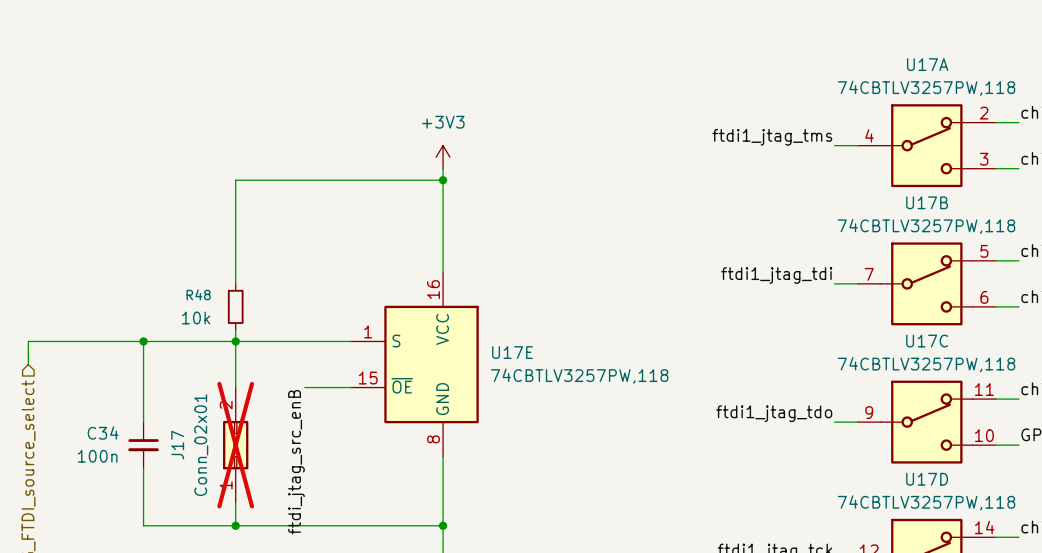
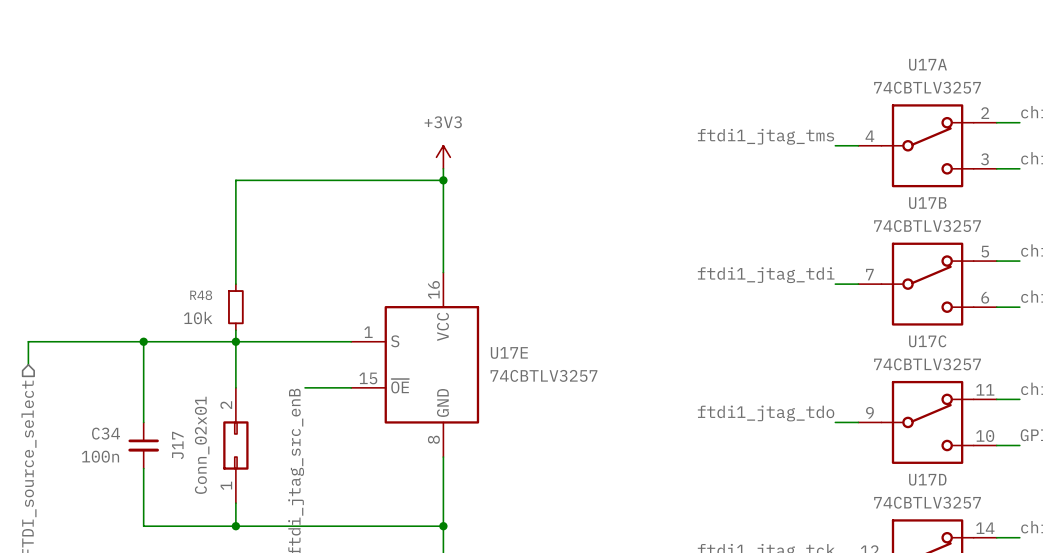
U17A value: 74CBTLV3257PW,118 (926, 88) -> 74CBTLV3257 (927, 87)
U17B value: 74CBTLV3257PW,118 (926, 226) -> 74CBTLV3257 (927, 226)
U17C value: 74CBTLV3257PW,118 (926, 364) -> 74CBTLV3257 (927, 364)
U17E value: 74CBTLV3257PW,118 (579, 376) -> 74CBTLV3257 (543, 375)
J17 do-not-place cross: (235, 445) -> none
U17D value: 74CBTLV3257PW,118 (926, 502) -> 74CBTLV3257 (927, 502)

